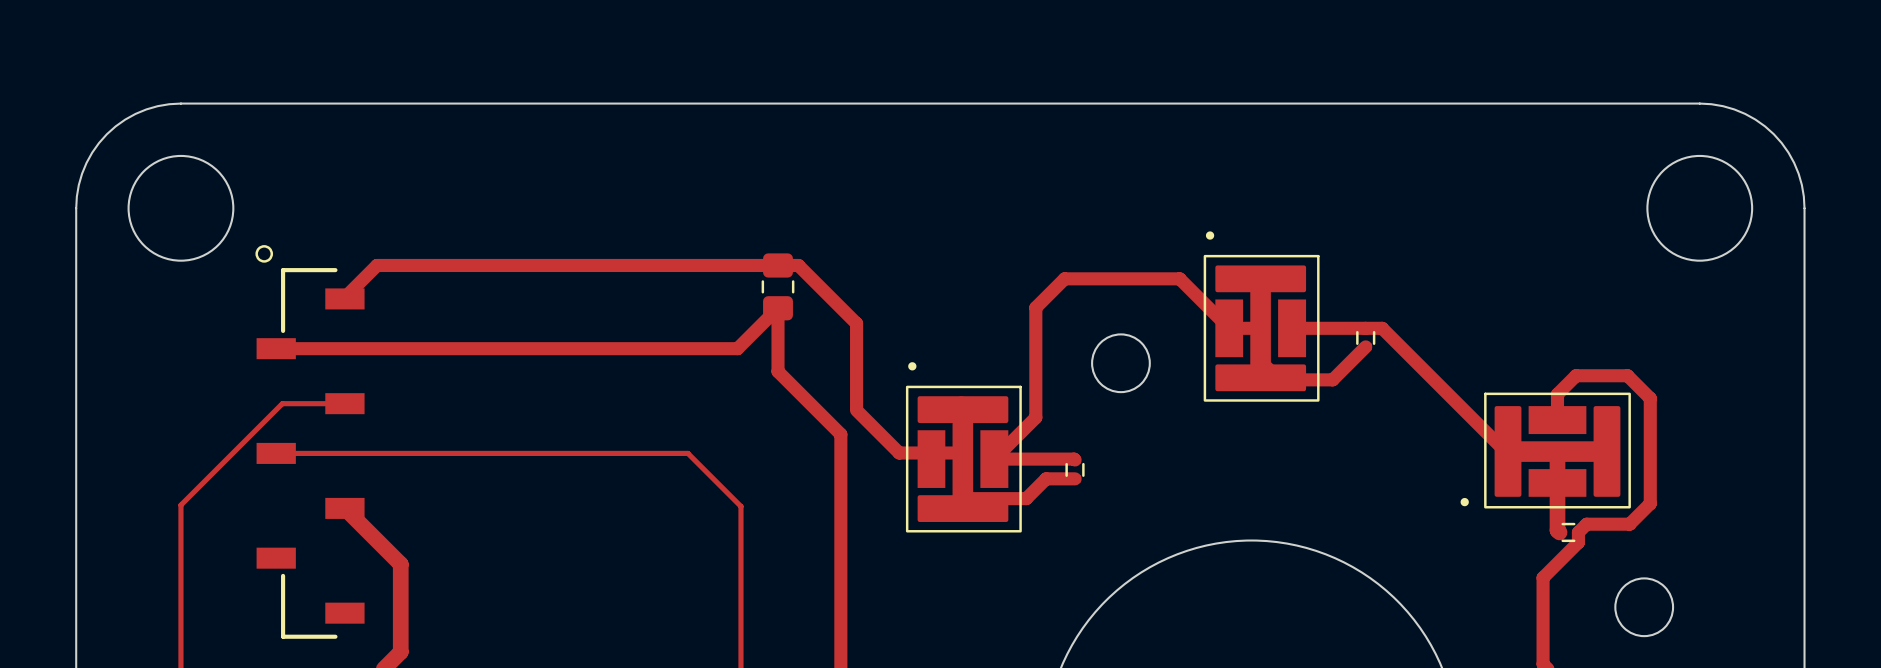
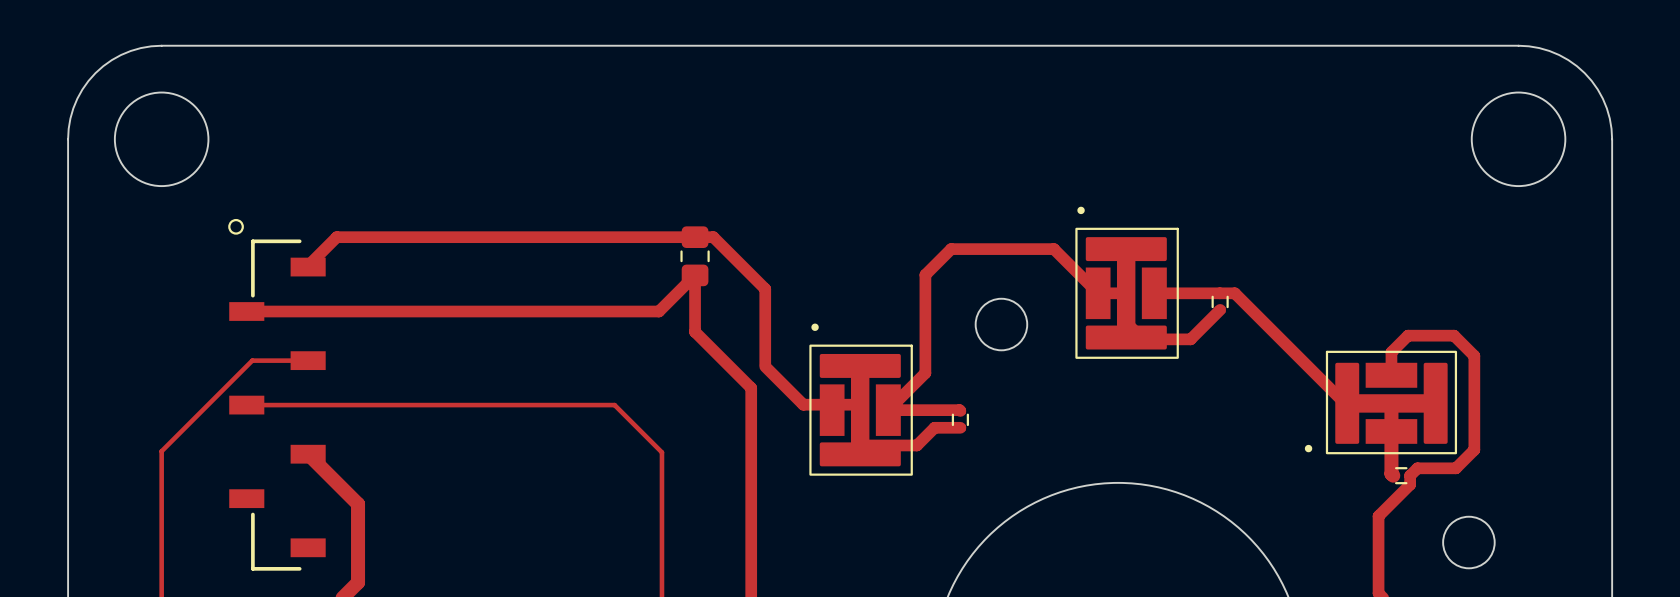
board edge: (76, 208) (78, 185) (86, 162) (106, 134) (125, 119) (146, 109) (180, 103) (1711, 104) (1745, 113) (1773, 134) (1794, 162) (1801, 185) (1804, 208) -> (68, 186) (68, 128) (73, 108) (82, 89) (95, 73) (121, 55) (140, 48) (161, 45) (1529, 46) (1549, 50) (1568, 60) (1584, 73) (1597, 89) (1606, 108) (1611, 128) (1612, 186)
round board edge position: (180, 208) -> (161, 139)
round board edge position: (1699, 208) -> (1518, 139)

